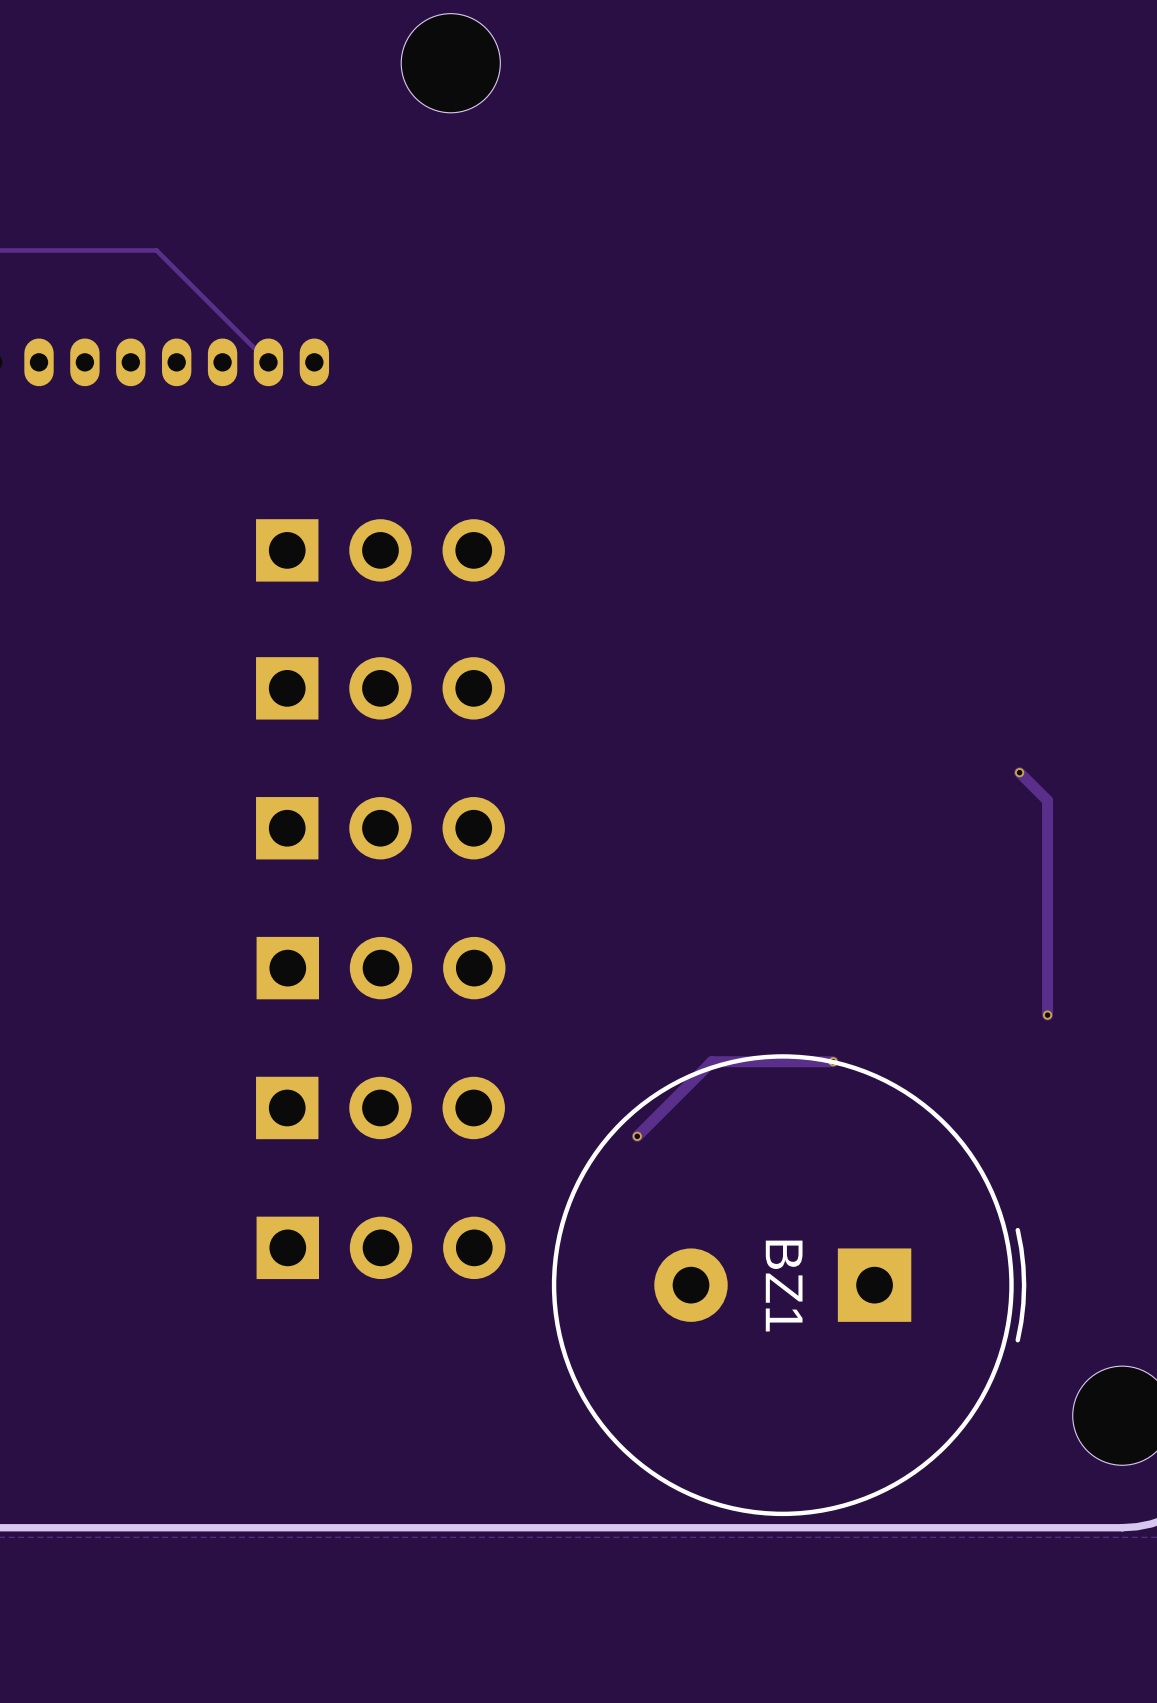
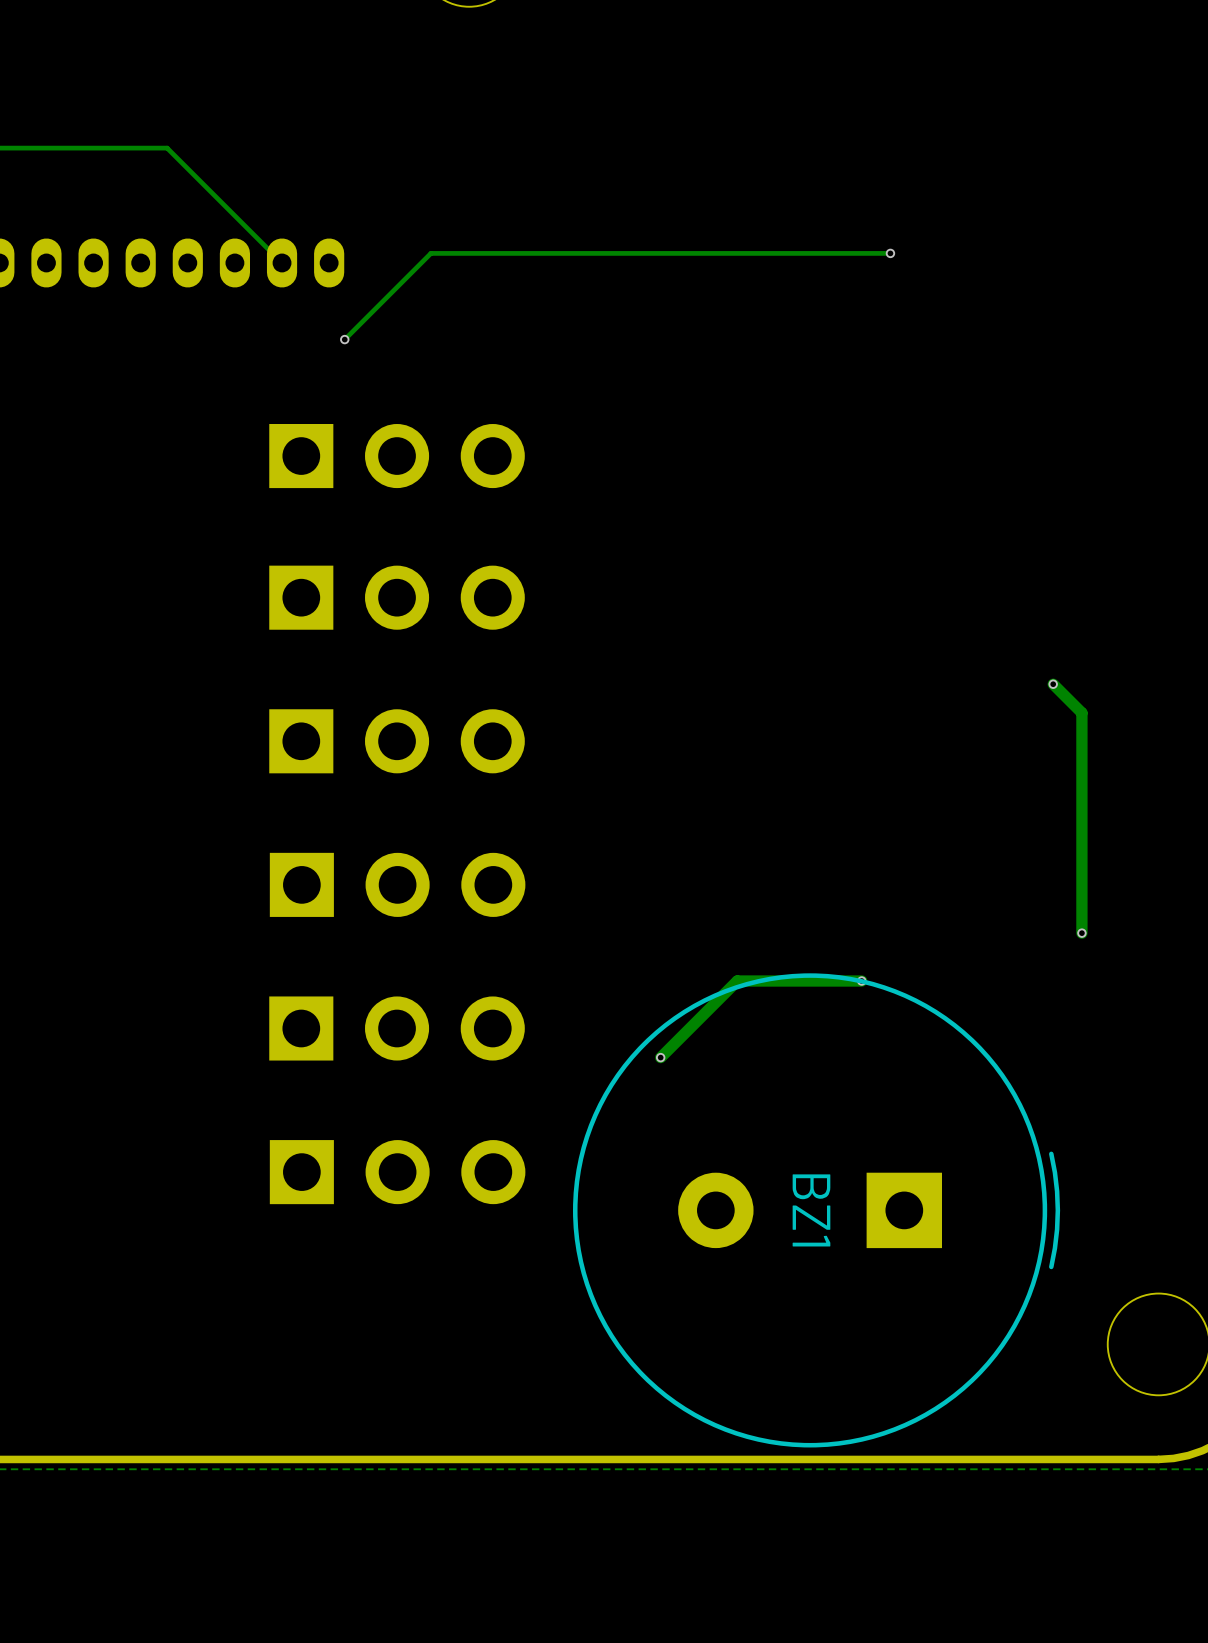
track: none -> (890, 253) (430, 253) (344, 339)
via: none -> (890, 253)
via: none -> (344, 339)

